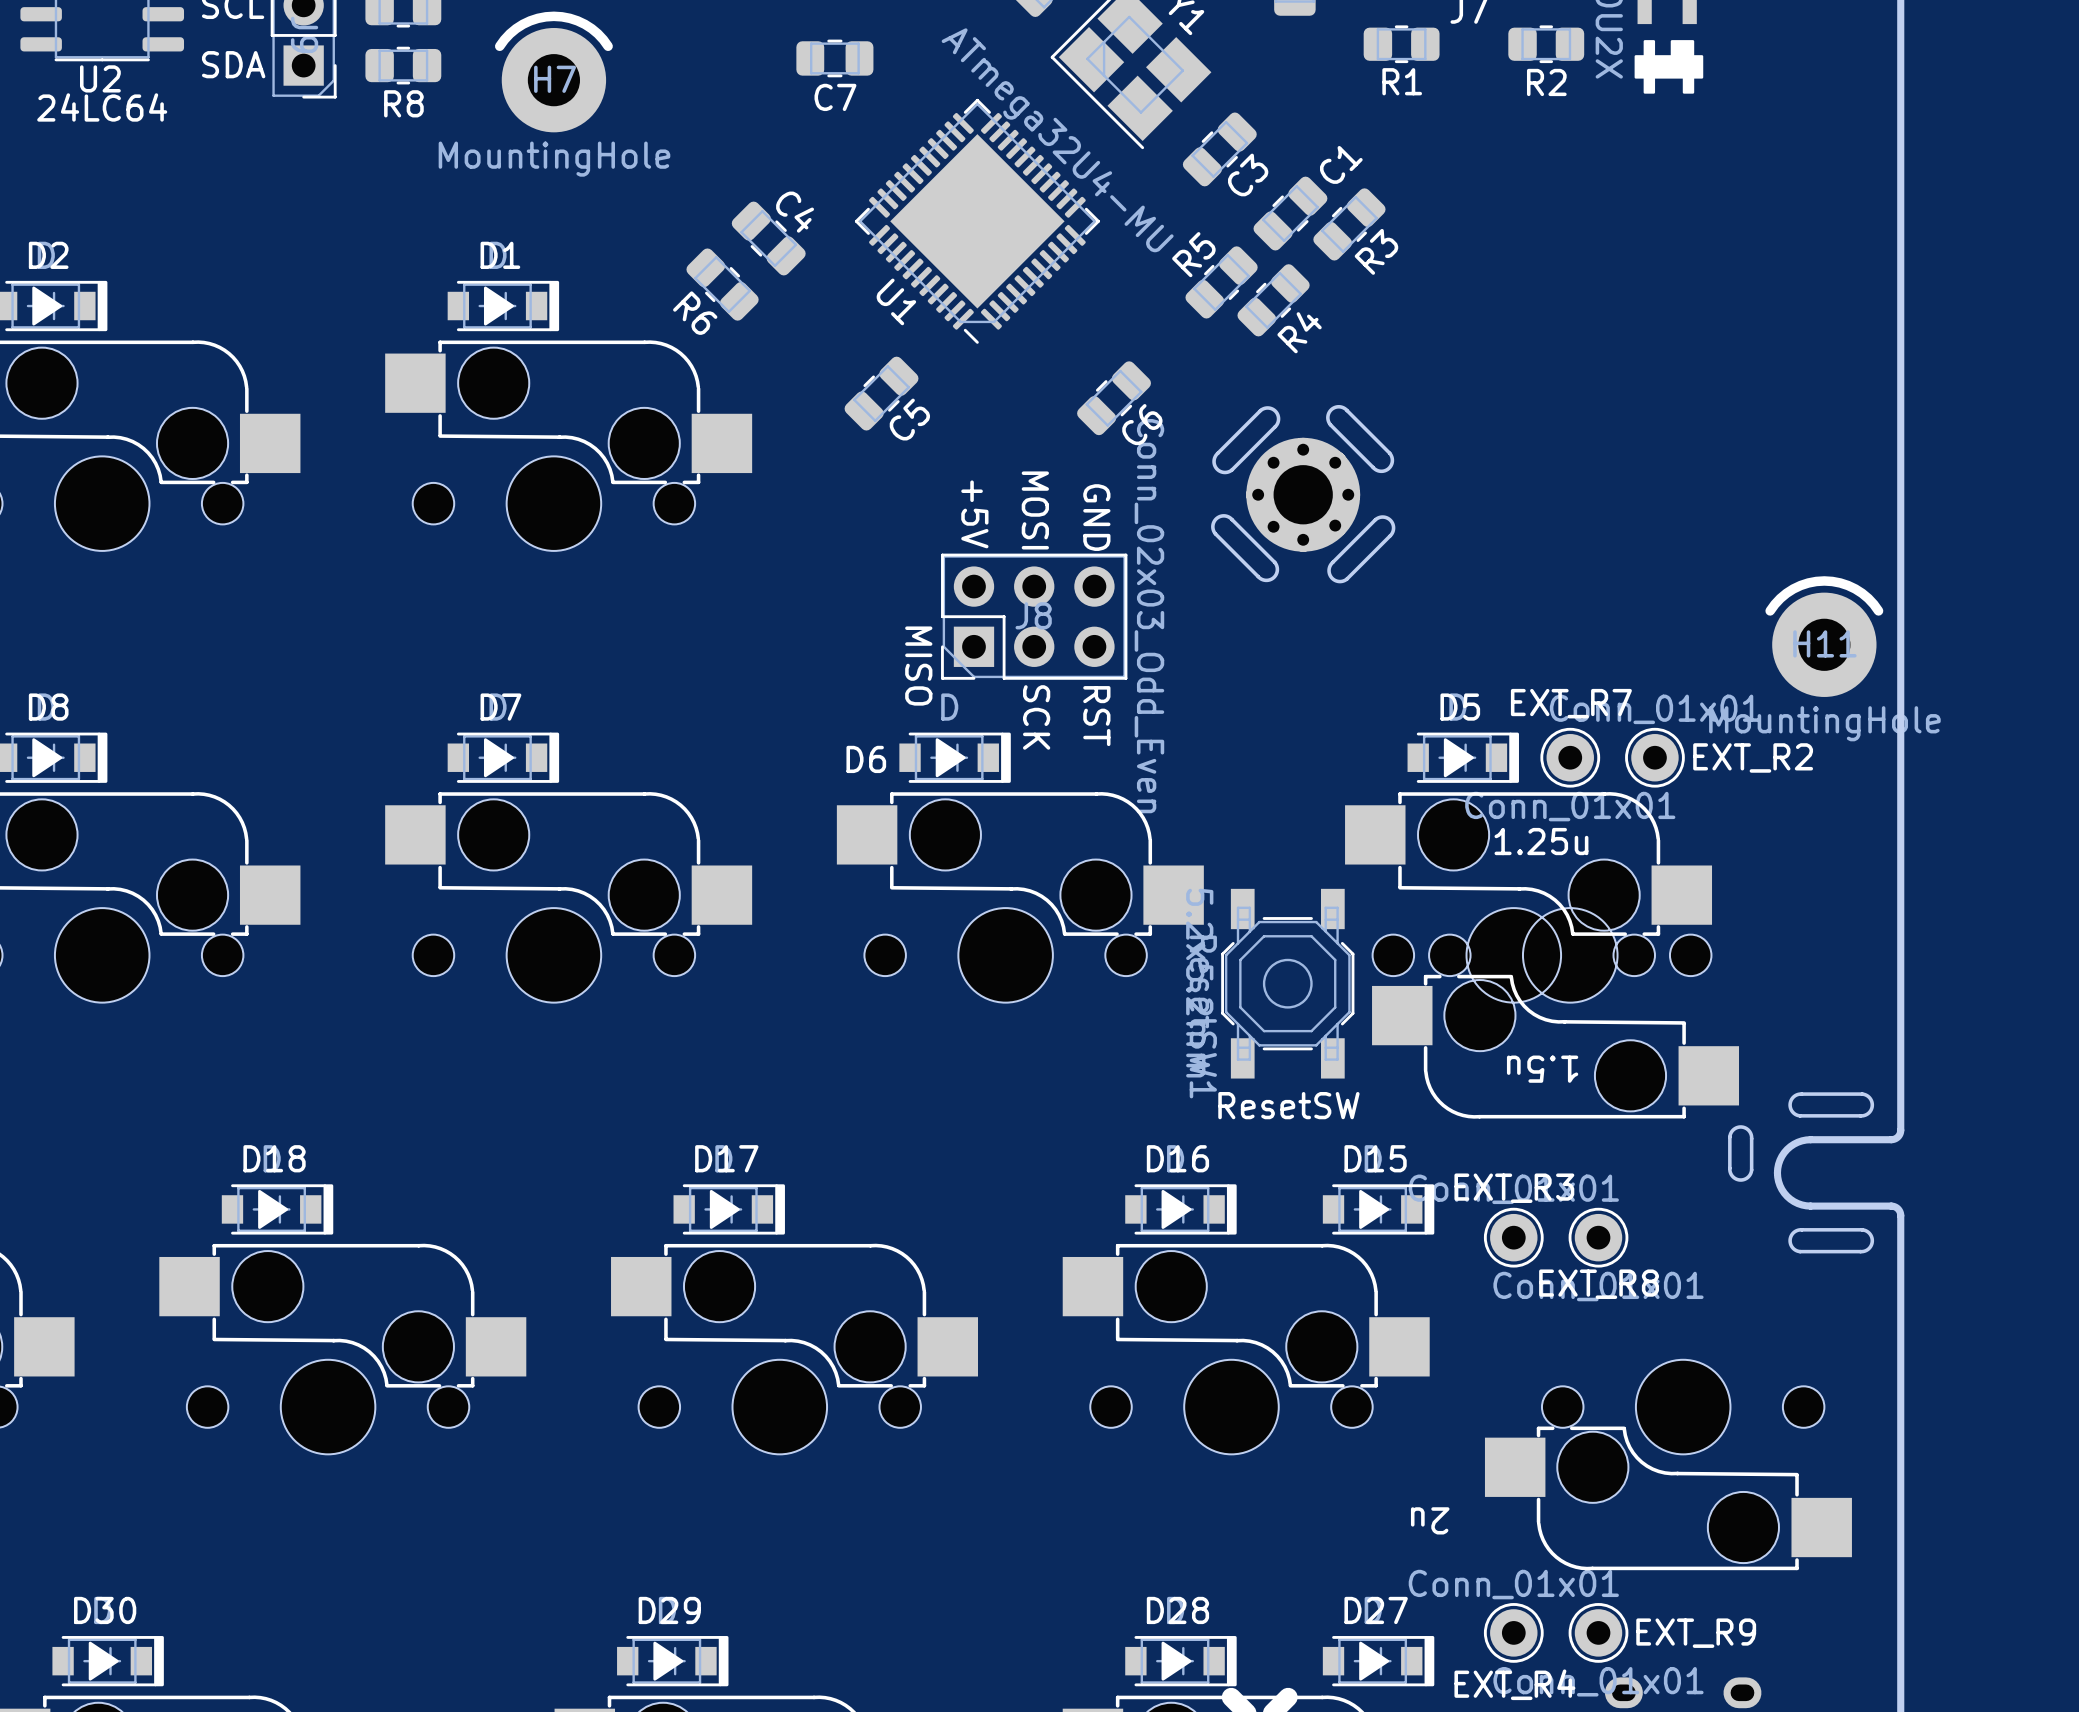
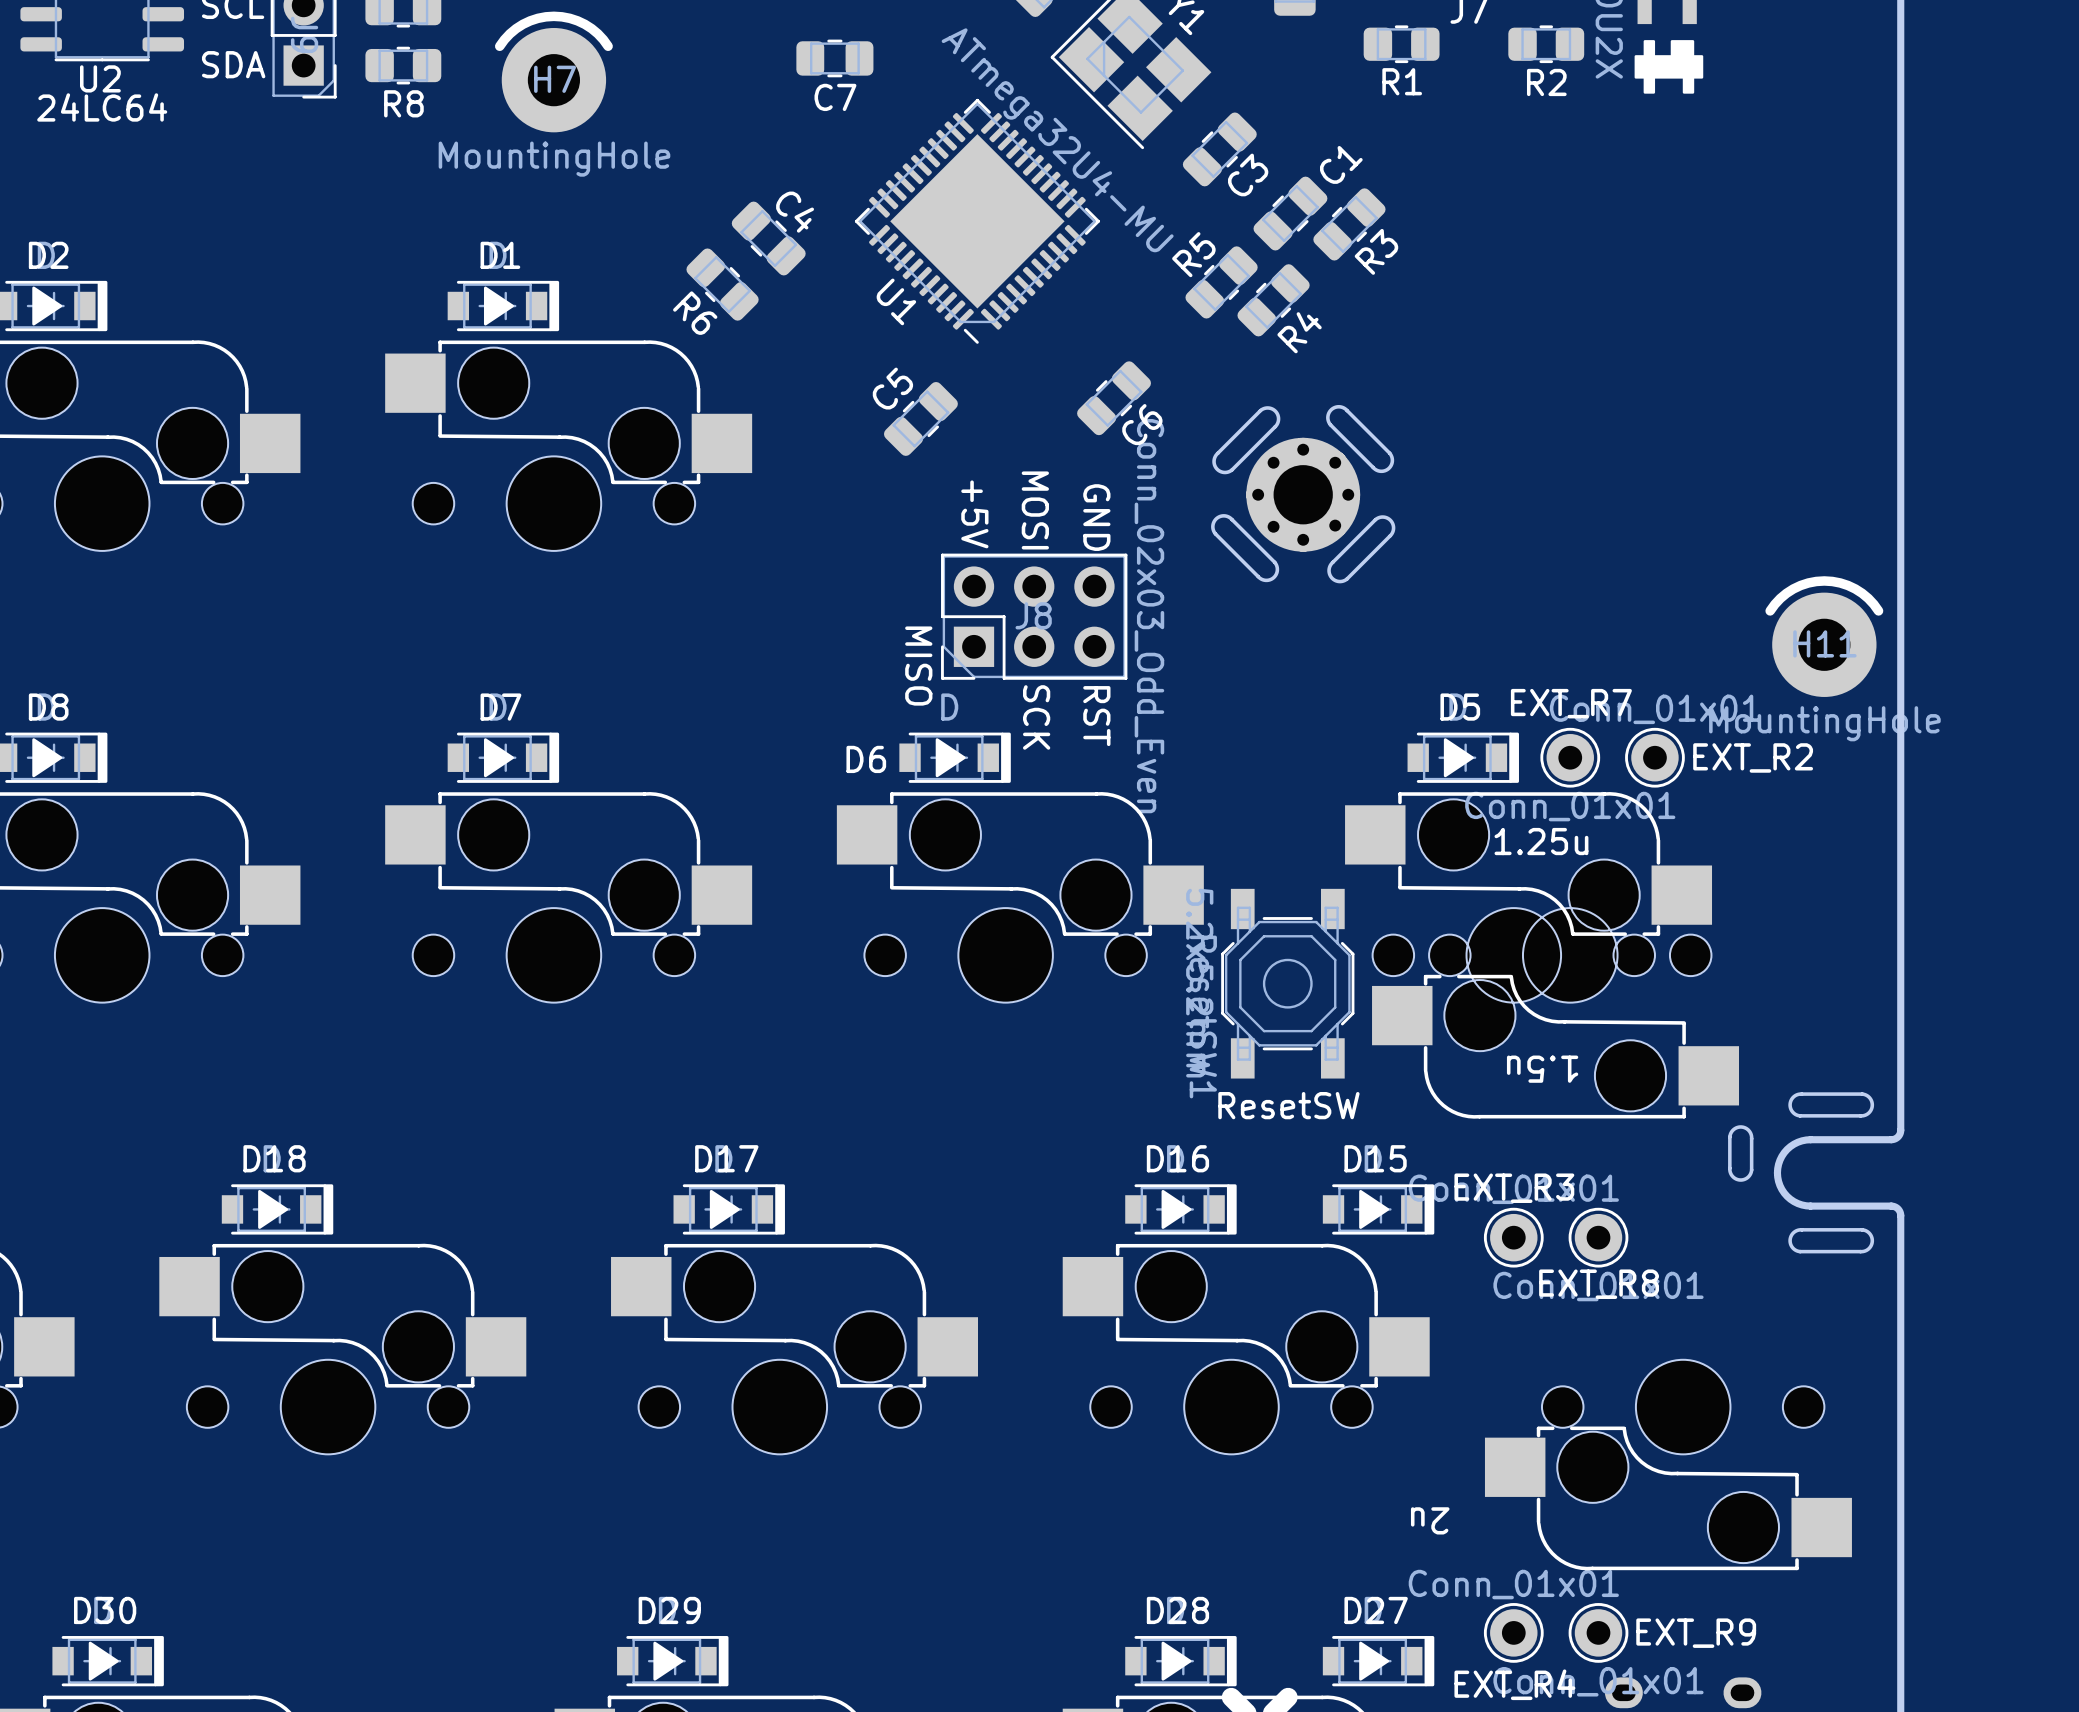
C5 position: (881, 393) -> (920, 418)
C5 name position: C5 (909, 419) -> C5 (892, 388)

